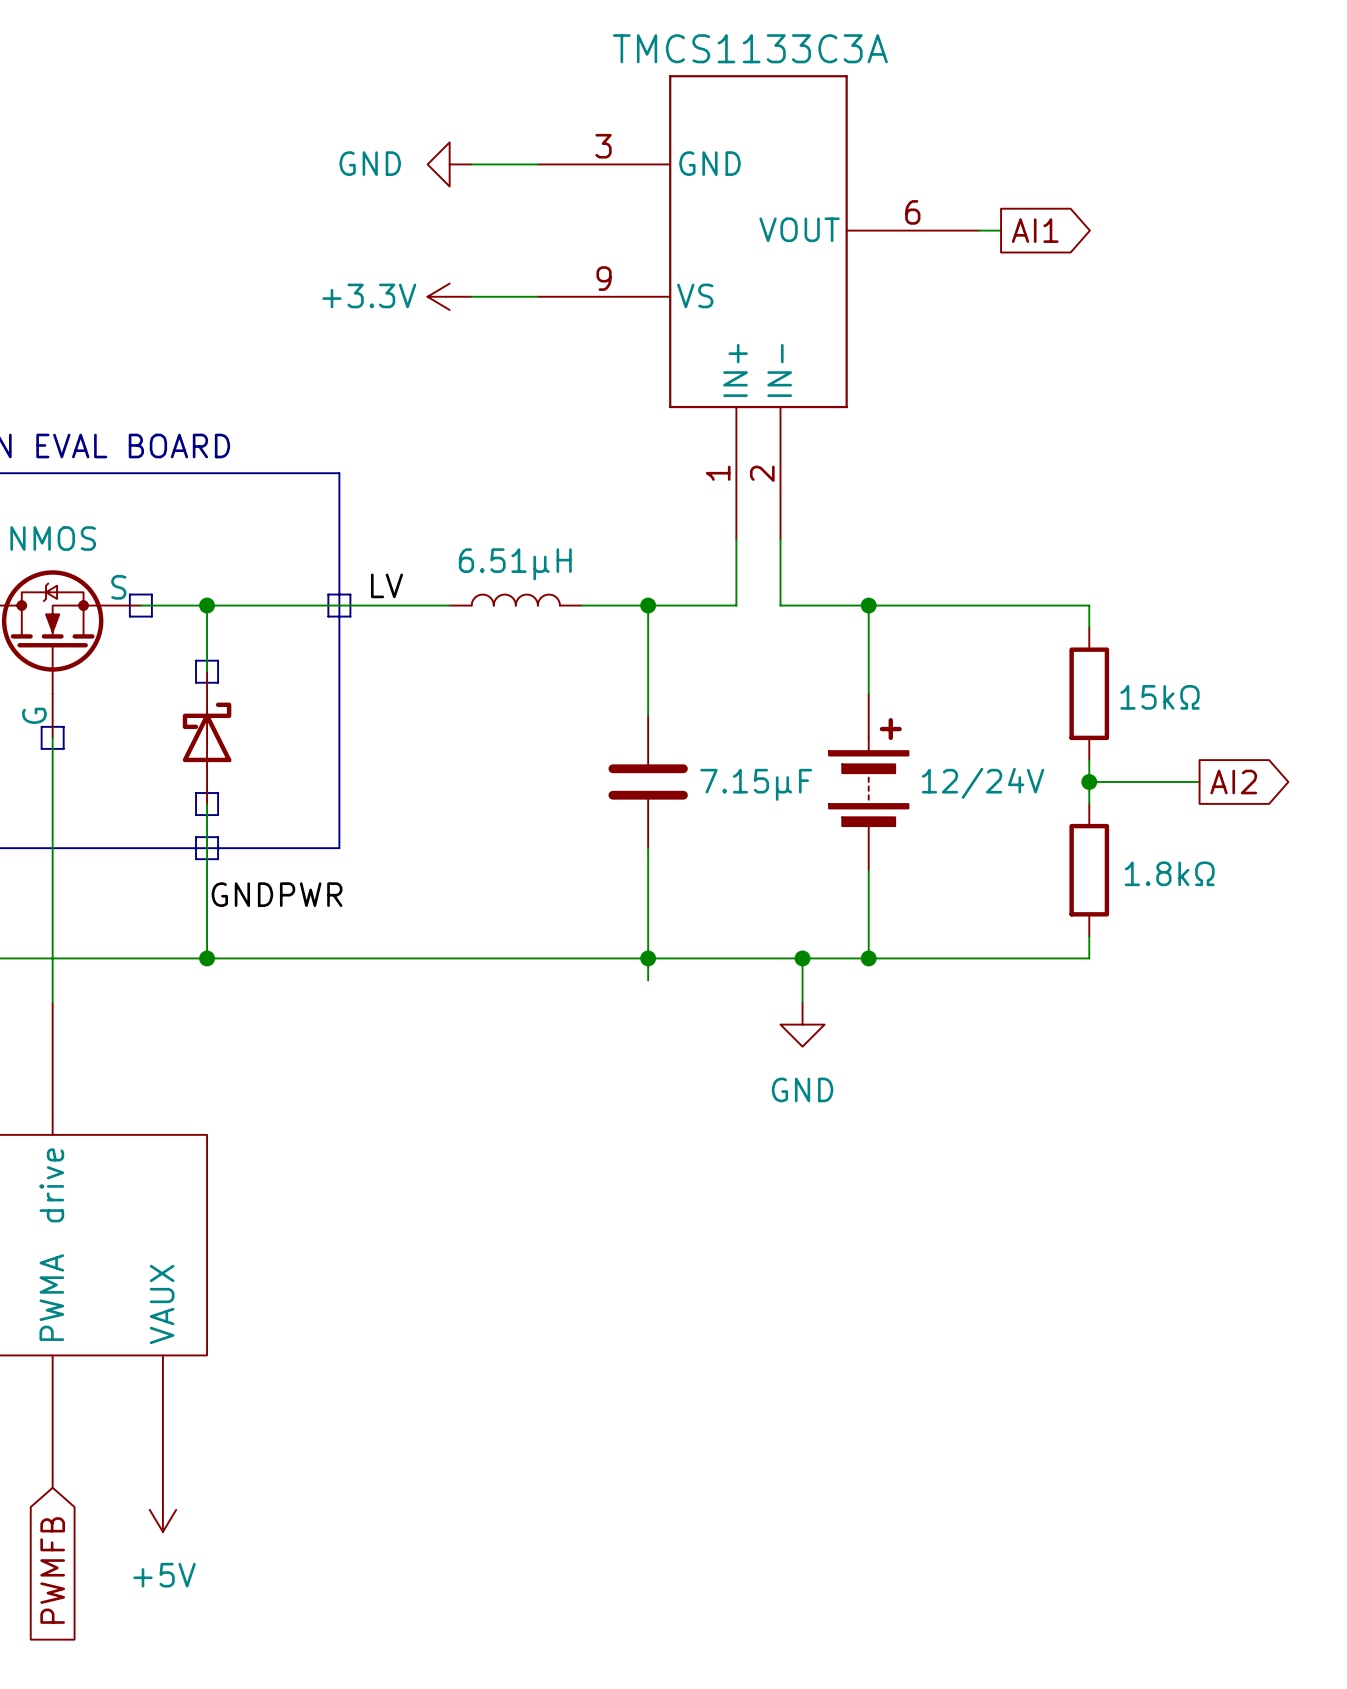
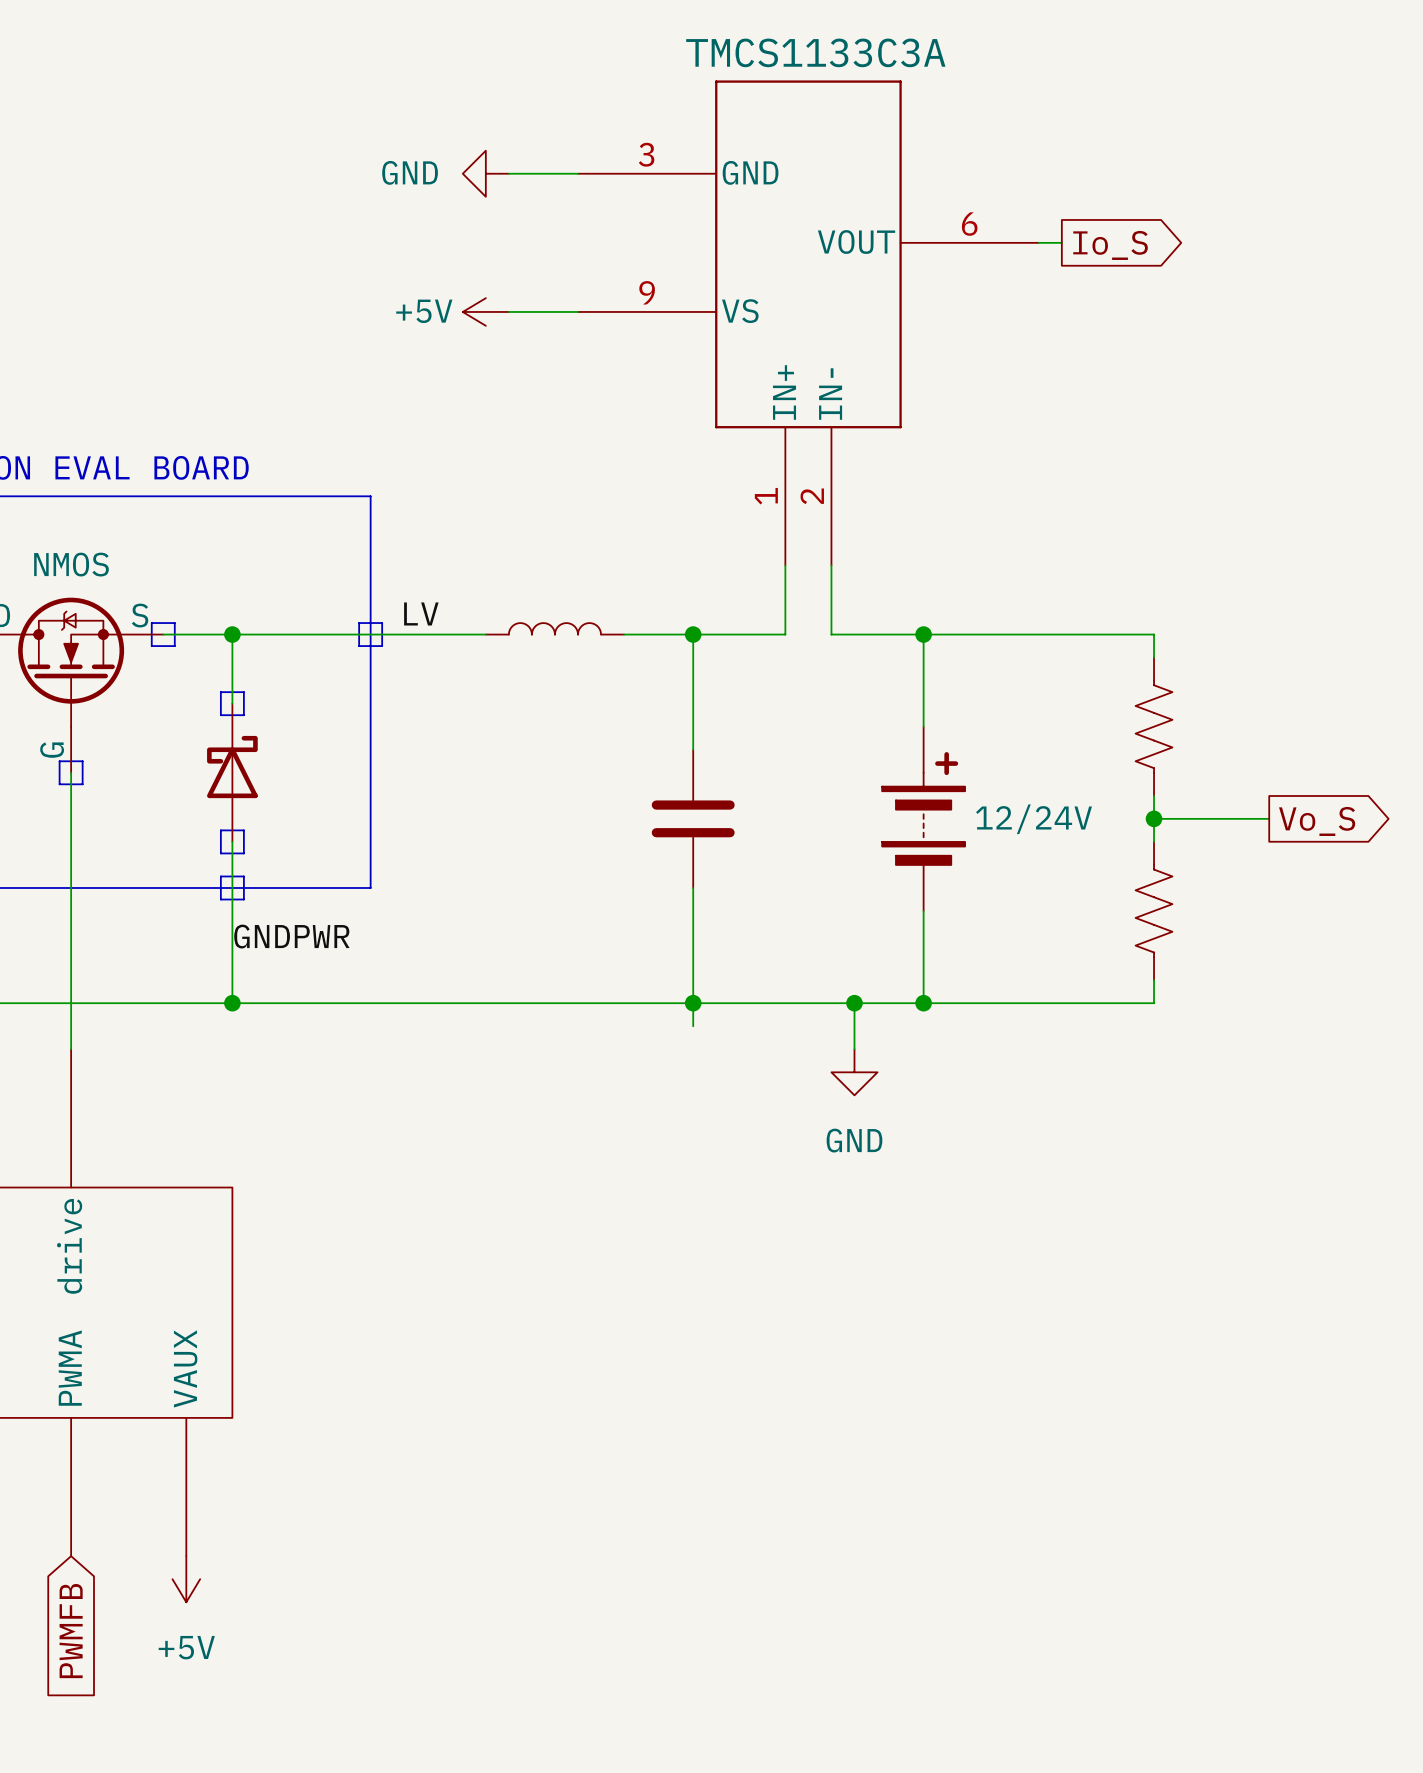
global label: AI1 (1035, 230) -> Io_S (1110, 245)
power symbol: +3.3V (449, 296) -> +5V (485, 311)
part value: 6.51µH (515, 564) -> none
part symbol: [1069, 627, 1110, 760] -> [1135, 657, 1173, 796]
part value: 15kΩ (1160, 697) -> none
global label: AI2 (1233, 781) -> Vo_S (1317, 821)
part value: 7.15μF (756, 784) -> none
part symbol: [1069, 804, 1110, 937] -> [1135, 841, 1173, 981]
part value: 1.8kΩ (1169, 873) -> none

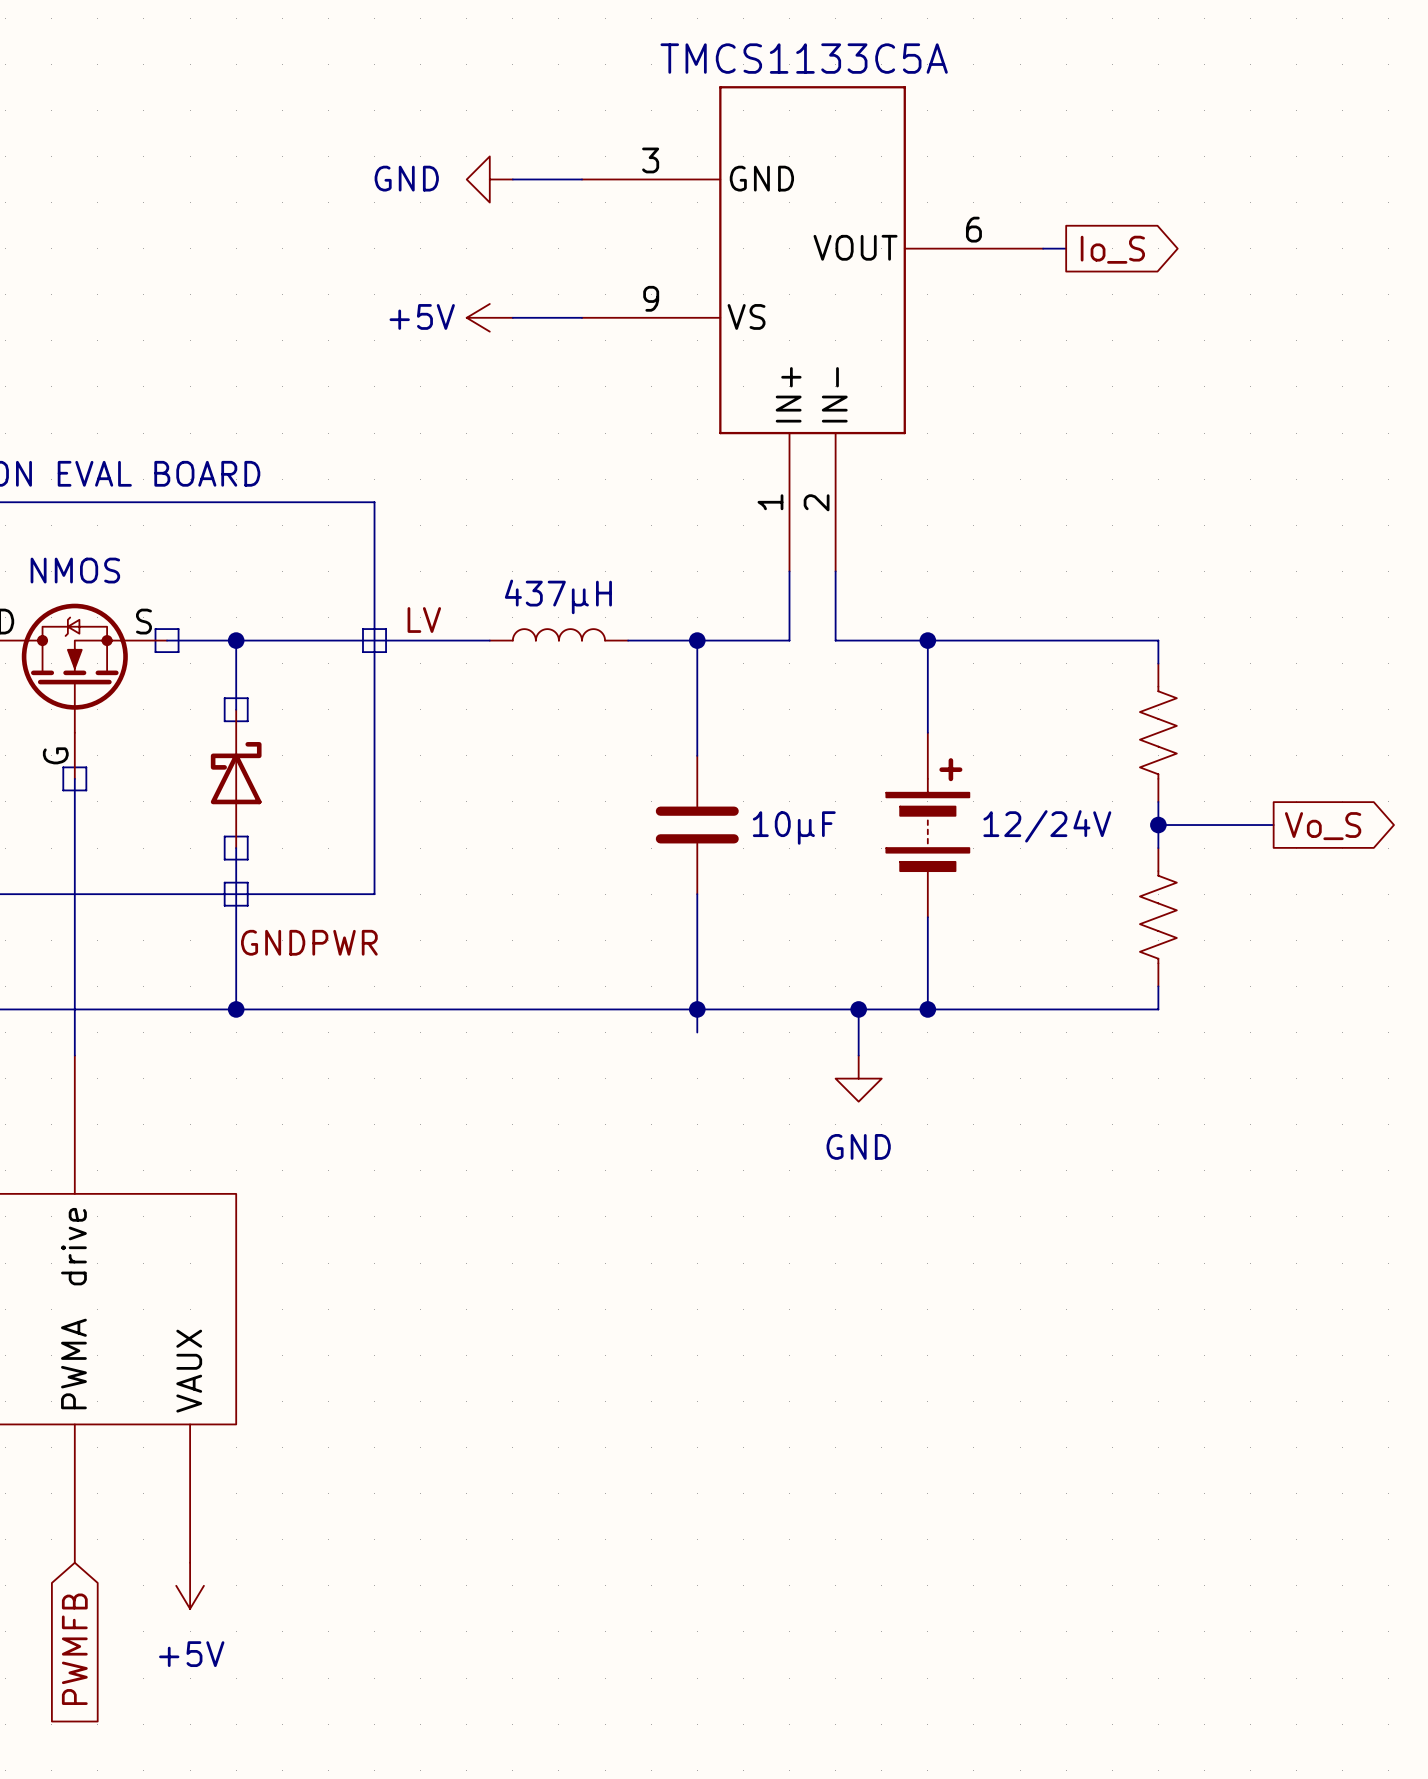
part value: TMCS1133C3A (815, 52) -> TMCS1133C5A (804, 58)
part value: none -> 437µH (558, 596)
part value: none -> 10μF (794, 827)

